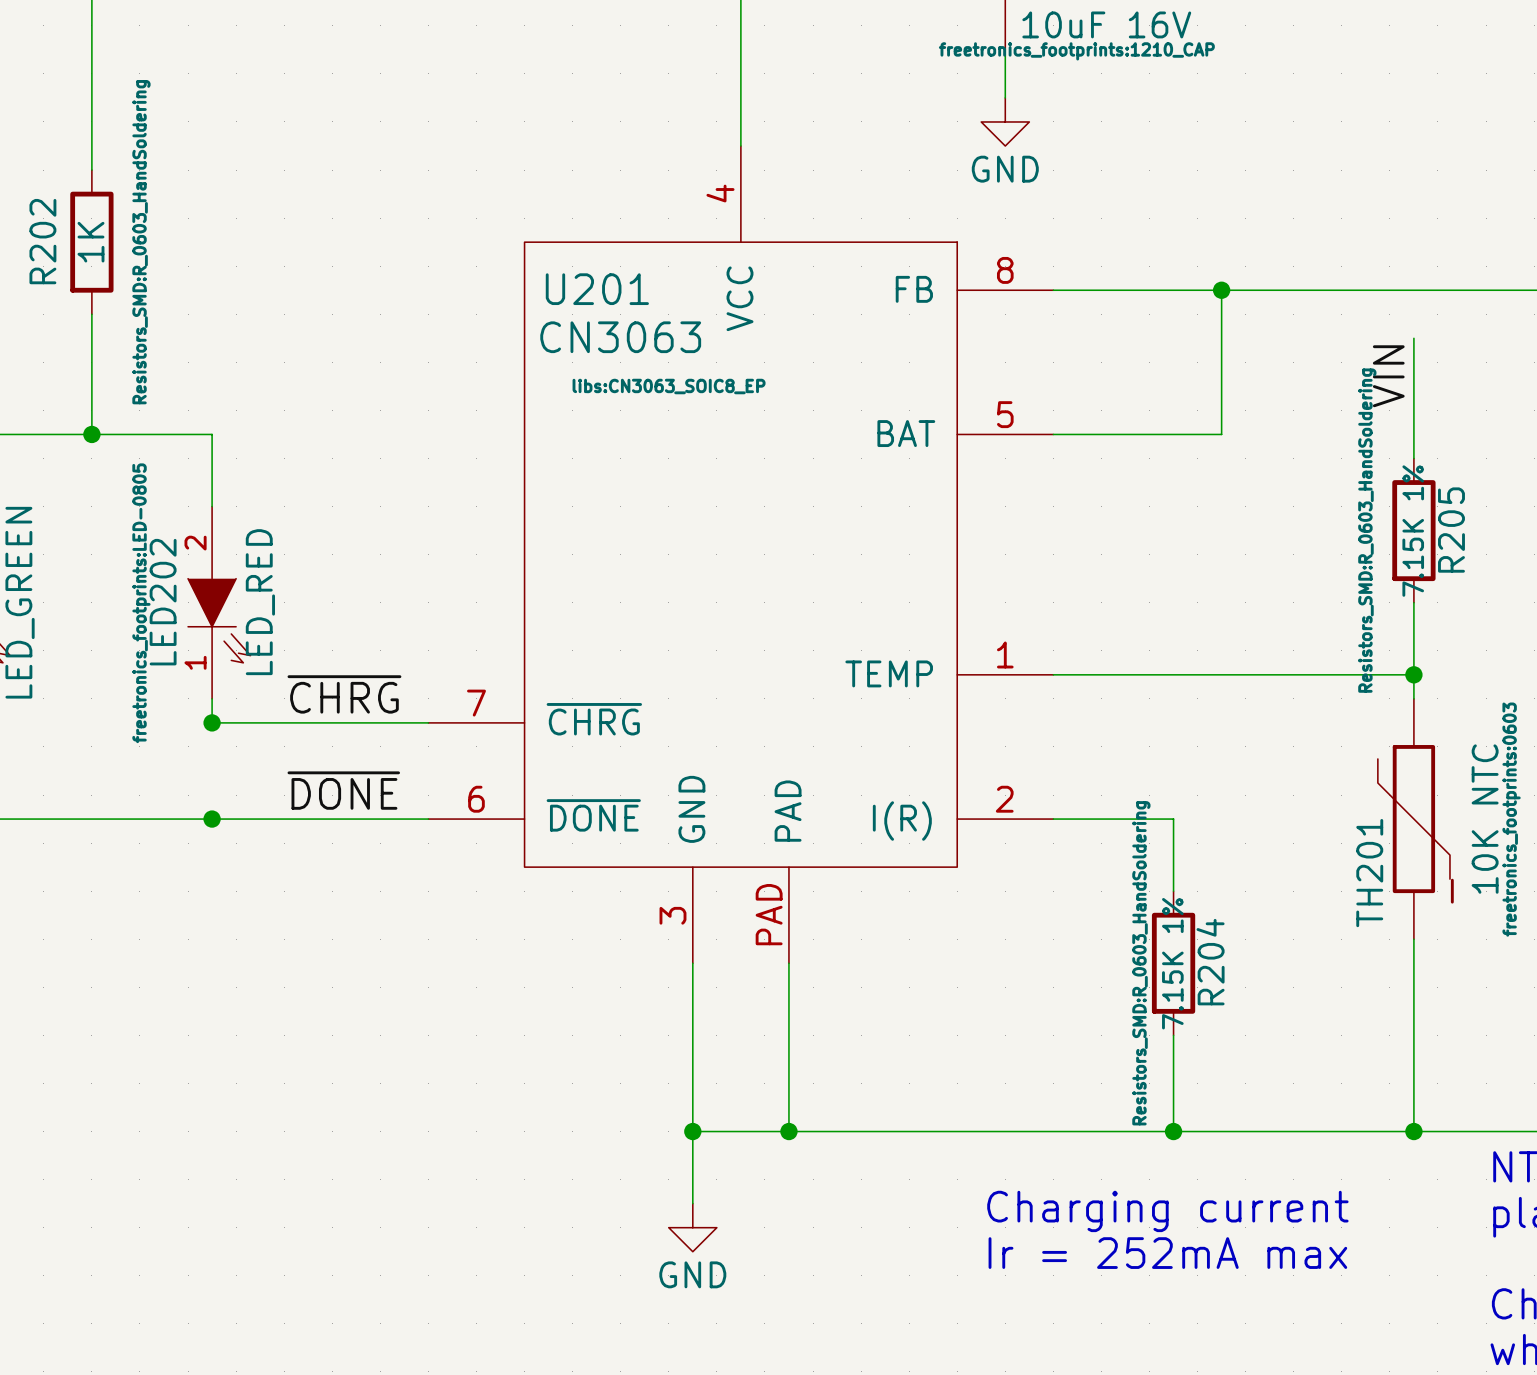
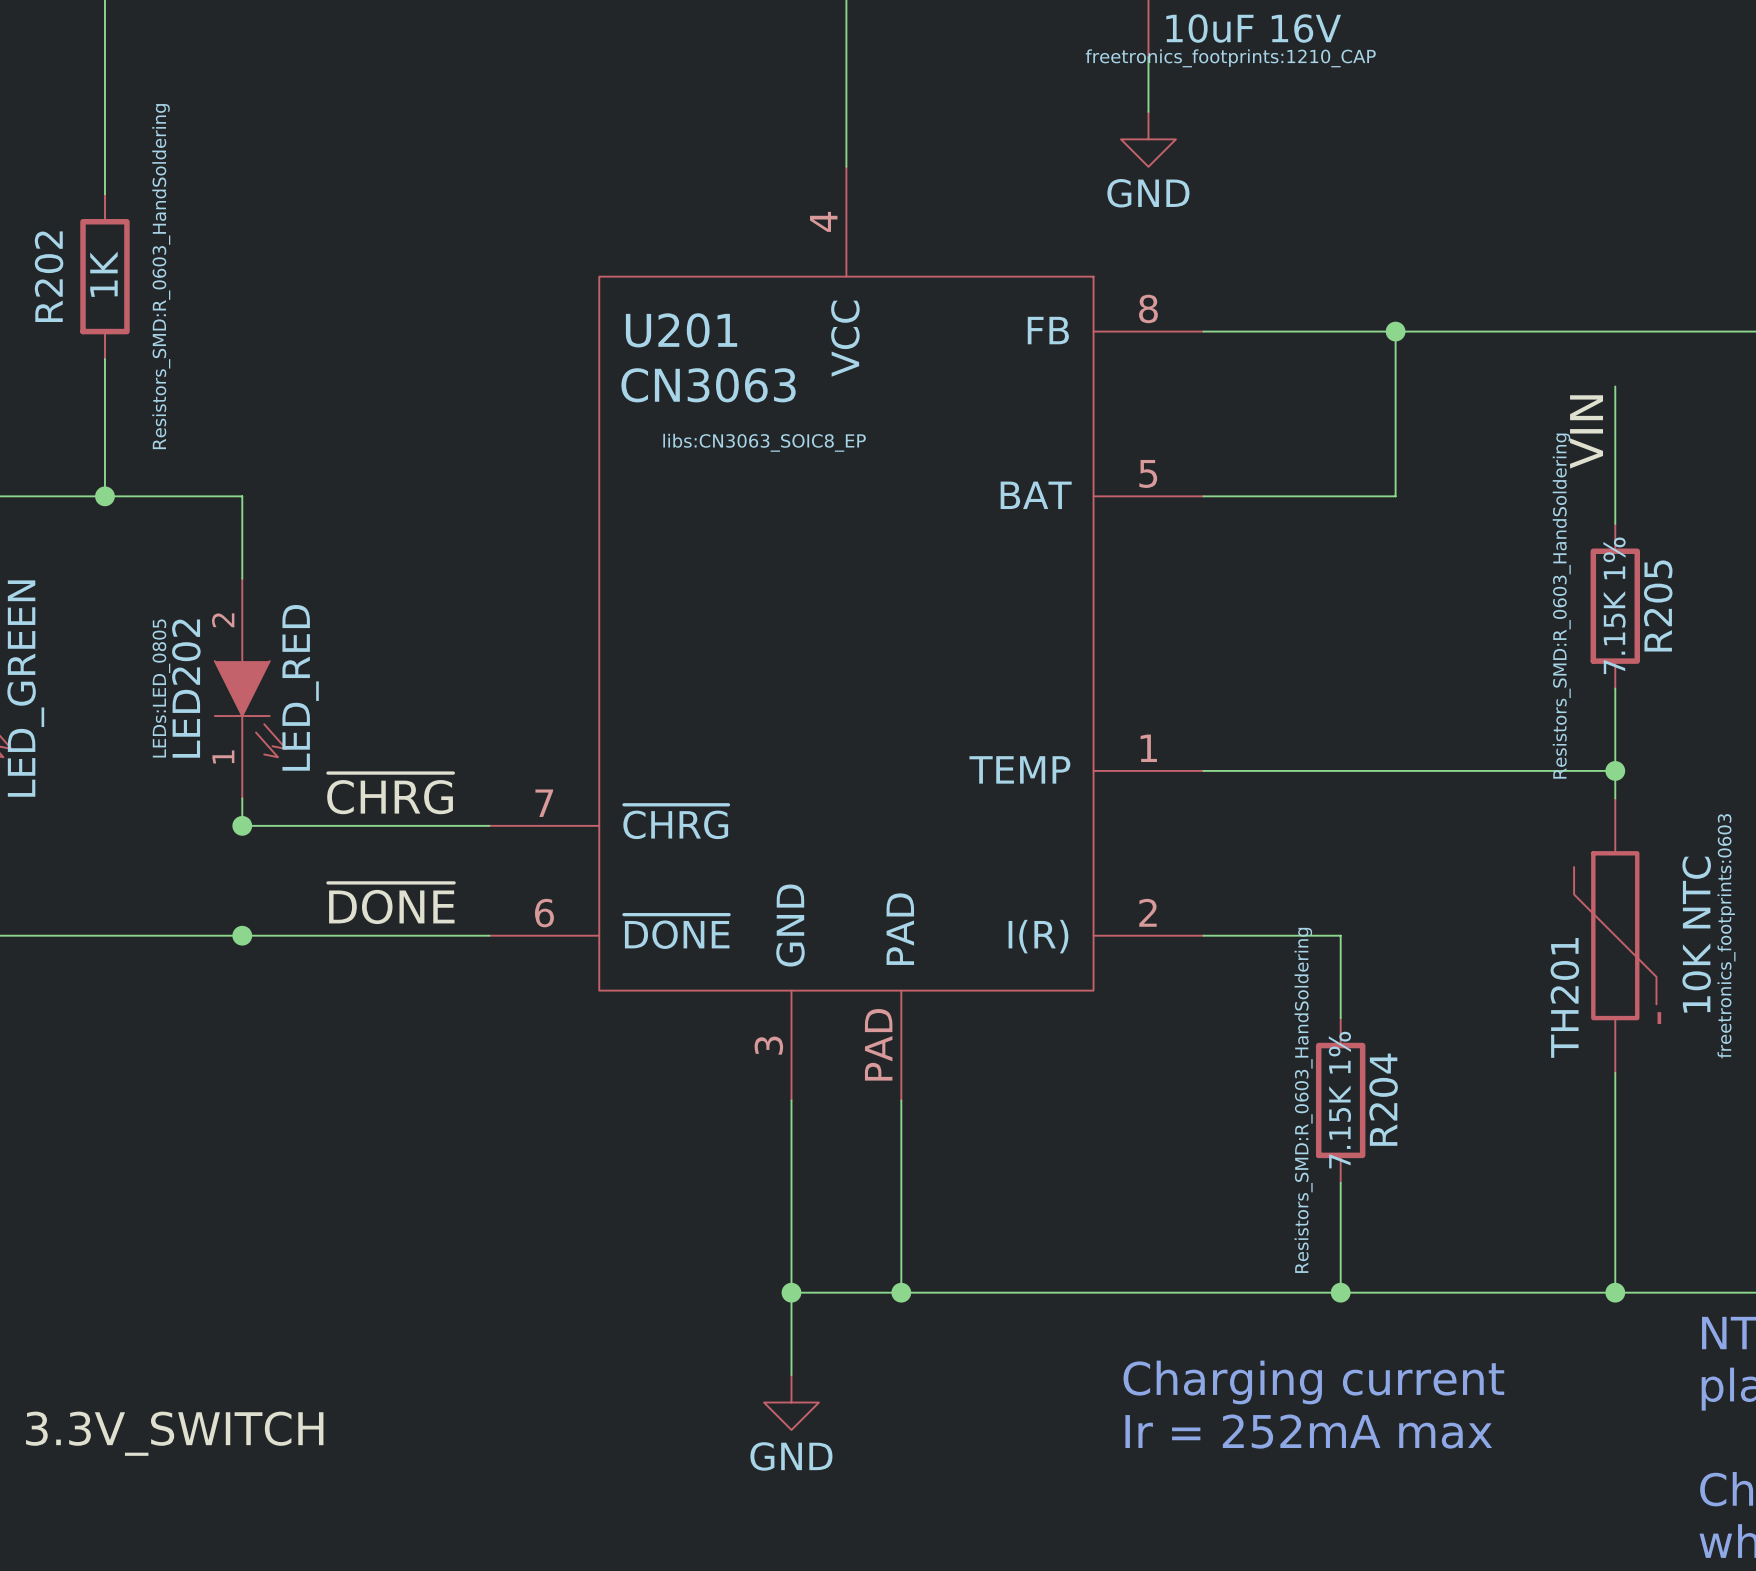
LED202 text: freetronics_footprints:LED-0805 (141, 603) -> LEDs:LED_0805 (161, 688)
label: none -> 3.3V_SWITCH (174, 1433)

